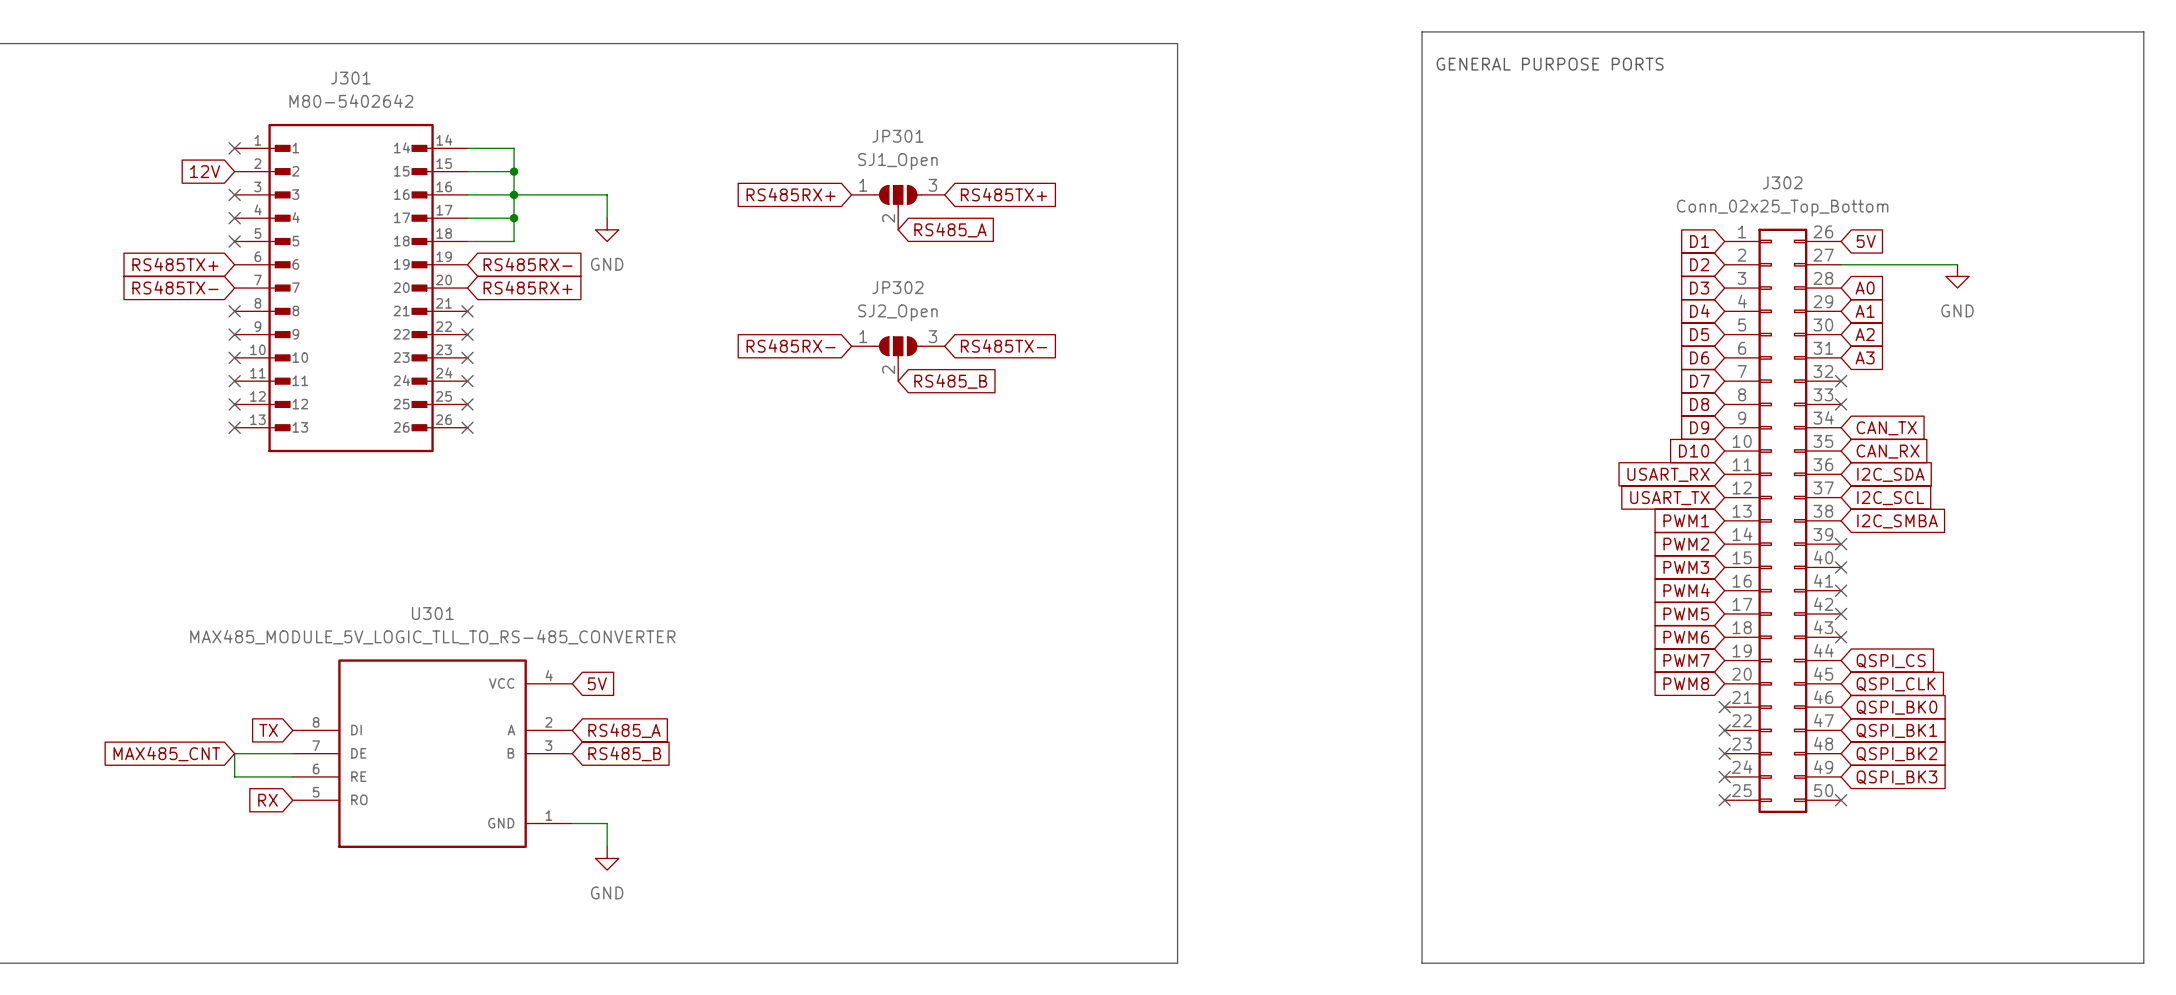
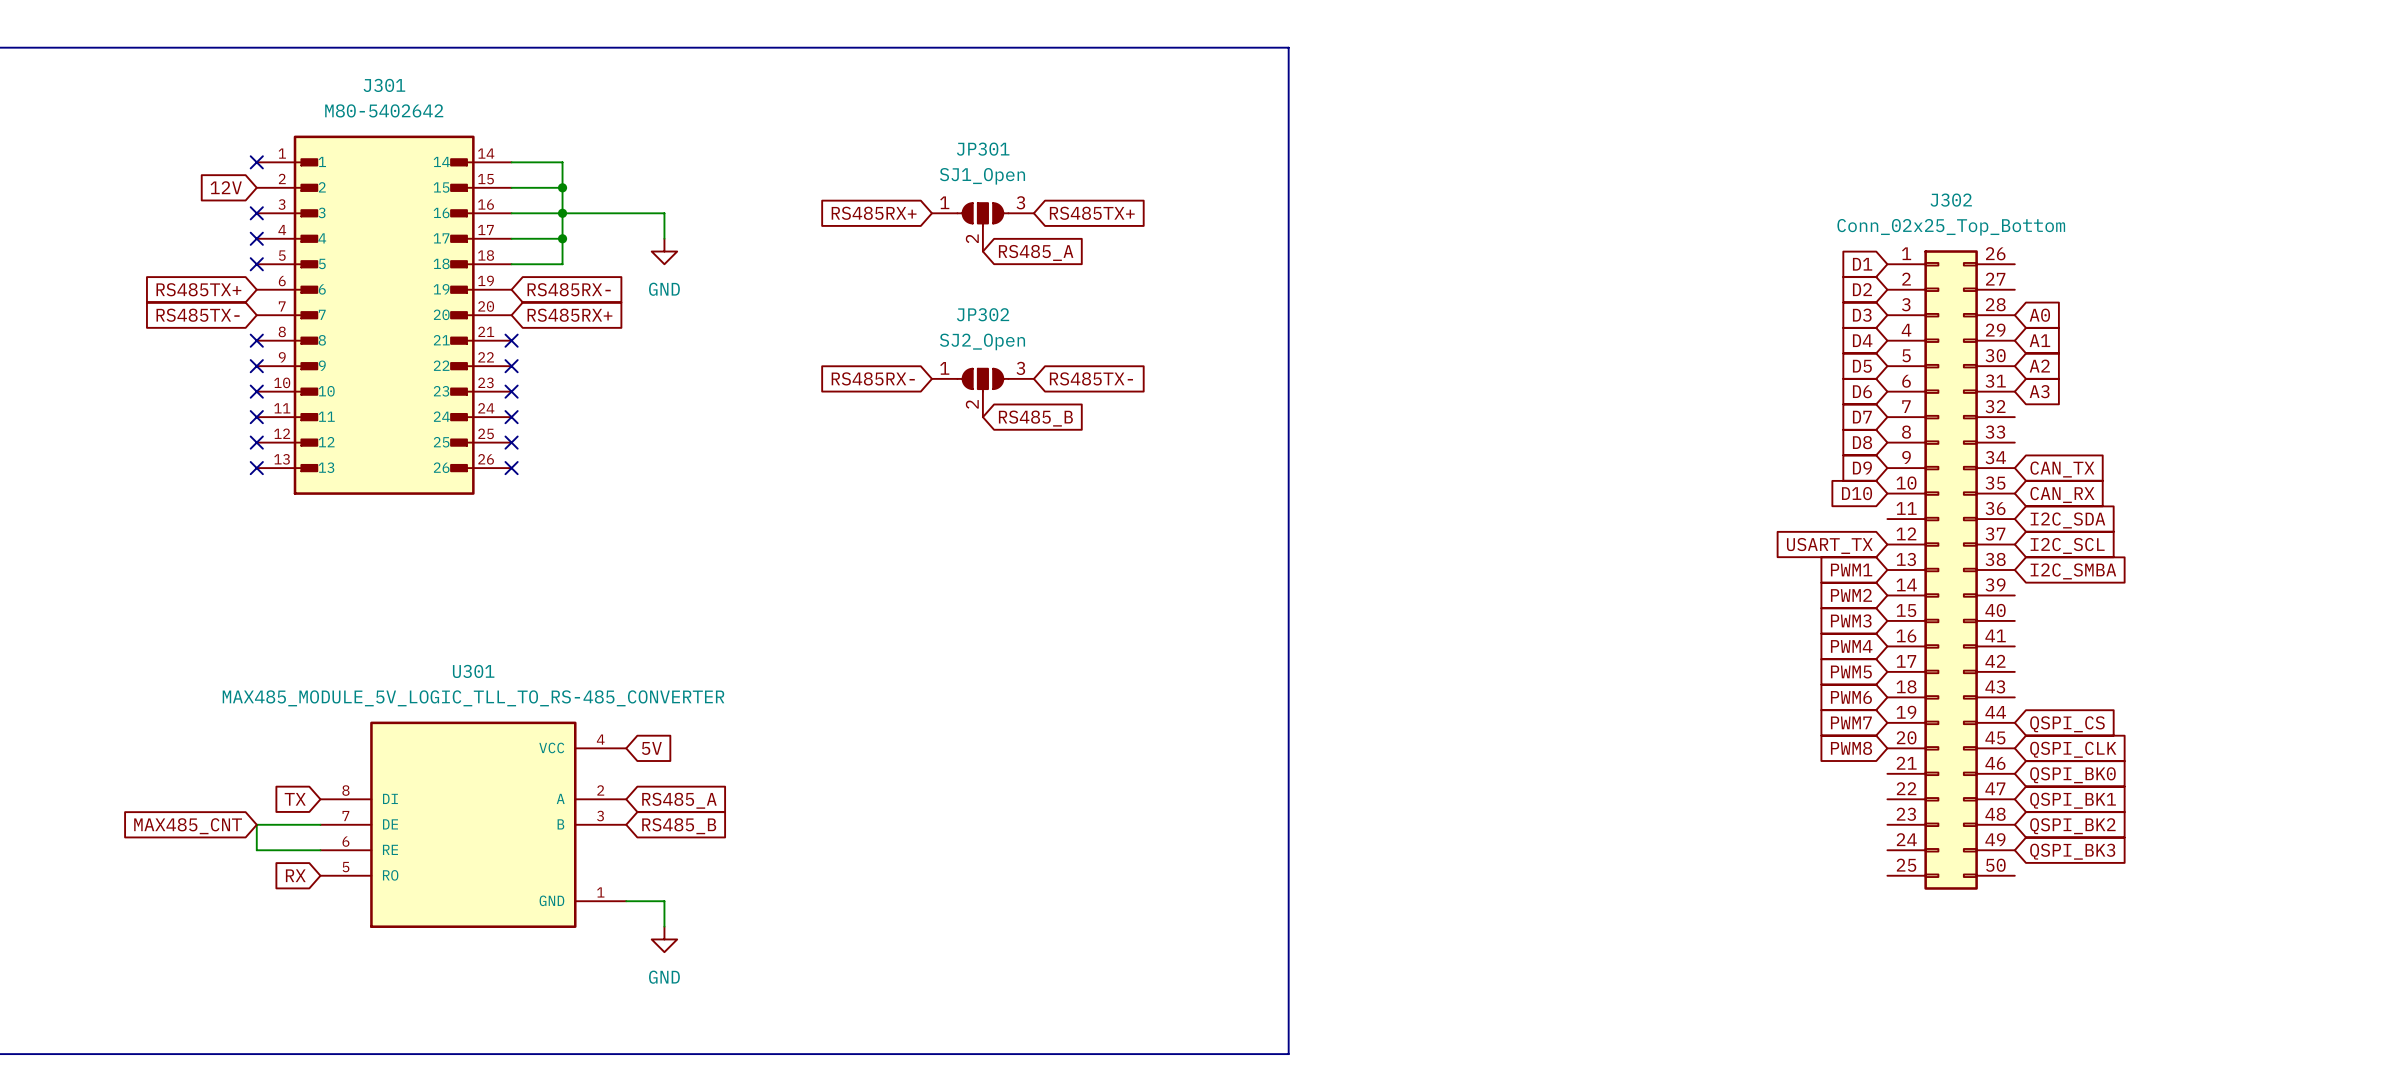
line: (1422, 31) (2143, 31) (2143, 963) (1422, 963) (1422, 31) -> none
text: GENERAL PURPOSE PORTS (1550, 64) -> none
global label: 5V (1866, 241) -> none
wire: (1841, 264) (1957, 264) -> none
power symbol: GND (1957, 276) -> none
no-connect mark: (1841, 381) -> none
no-connect mark: (1841, 404) -> none
global label: USART_RX (1668, 474) -> none
no-connect mark: (1841, 544) -> none
no-connect mark: (1841, 567) -> none
no-connect mark: (1841, 590) -> none
no-connect mark: (1841, 613) -> none
no-connect mark: (1841, 637) -> none
no-connect mark: (1724, 707) -> none
no-connect mark: (1724, 730) -> none
no-connect mark: (1724, 753) -> none
no-connect mark: (1724, 776) -> none
no-connect mark: (1724, 800) -> none
no-connect mark: (1841, 800) -> none

